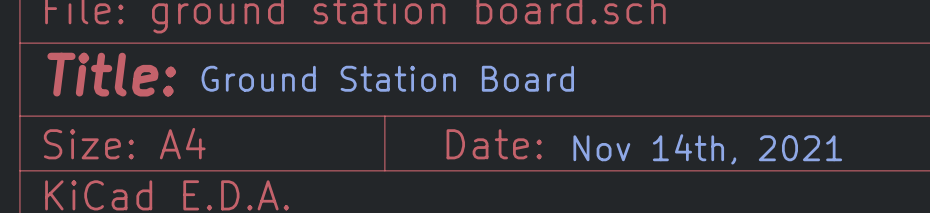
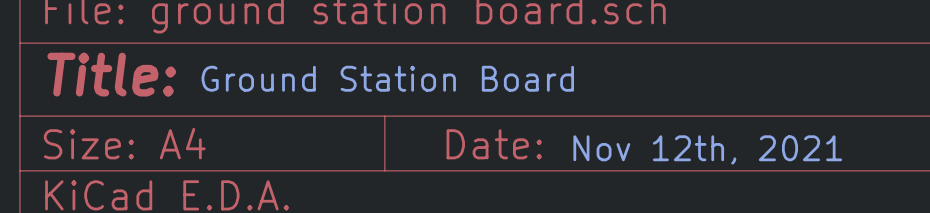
text: Nov 14th, 2021 (707, 149) -> Nov 12th, 2021 (707, 149)

